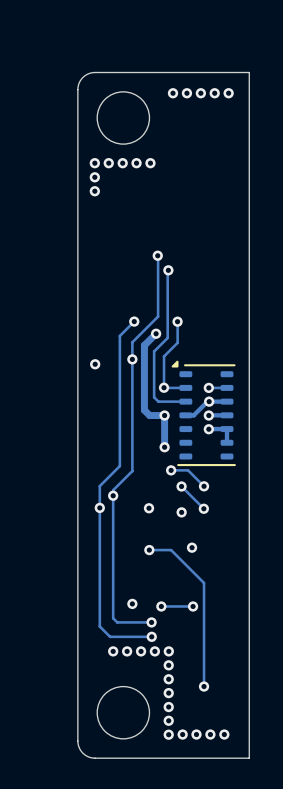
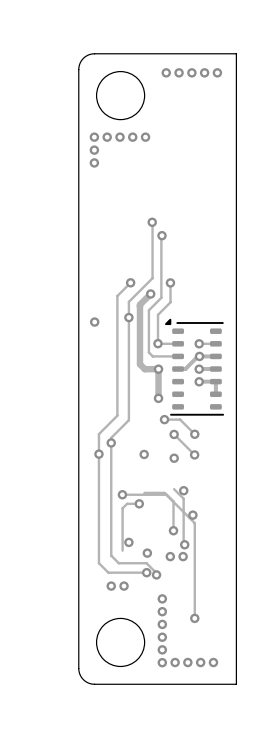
track: none -> (174, 489) (183, 498) (183, 540)
via: (149, 550) -> none
track: none -> (122, 494) (166, 494) (173, 501) (173, 530)
via: none -> (122, 494)
track: none -> (139, 503) (127, 503) (122, 508) (122, 550)
via: none -> (139, 503)
via: none -> (192, 515)
via: none -> (173, 530)
via: (161, 606) -> none
track: (193, 606) (161, 606) -> none
via: none -> (147, 553)
via: none -> (170, 556)
via: none -> (183, 556)
track: (151, 622) (117, 622) -> (156, 574) (146, 563) (118, 563) (115, 559)
via: (151, 622) -> none
via: none -> (156, 574)
via: (141, 651) -> none
via: (154, 651) -> none
via: (168, 651) -> none

